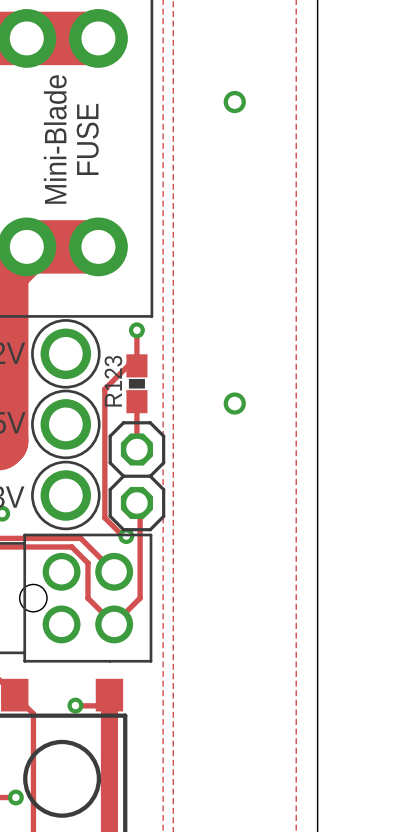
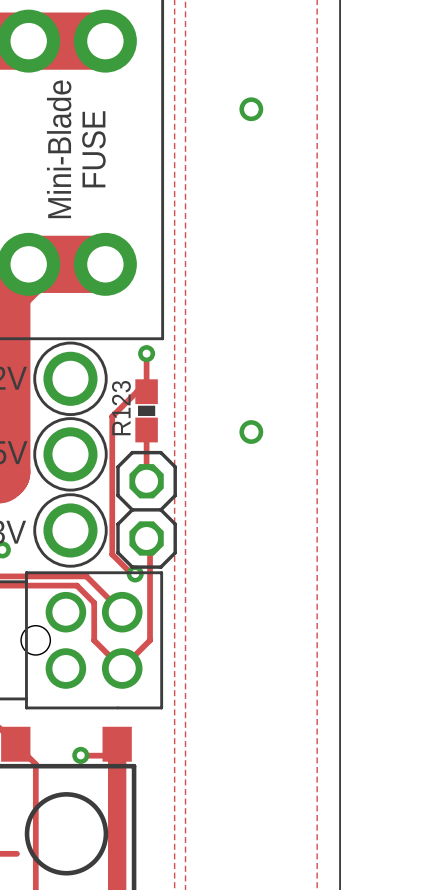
via: (15, 797) -> none

